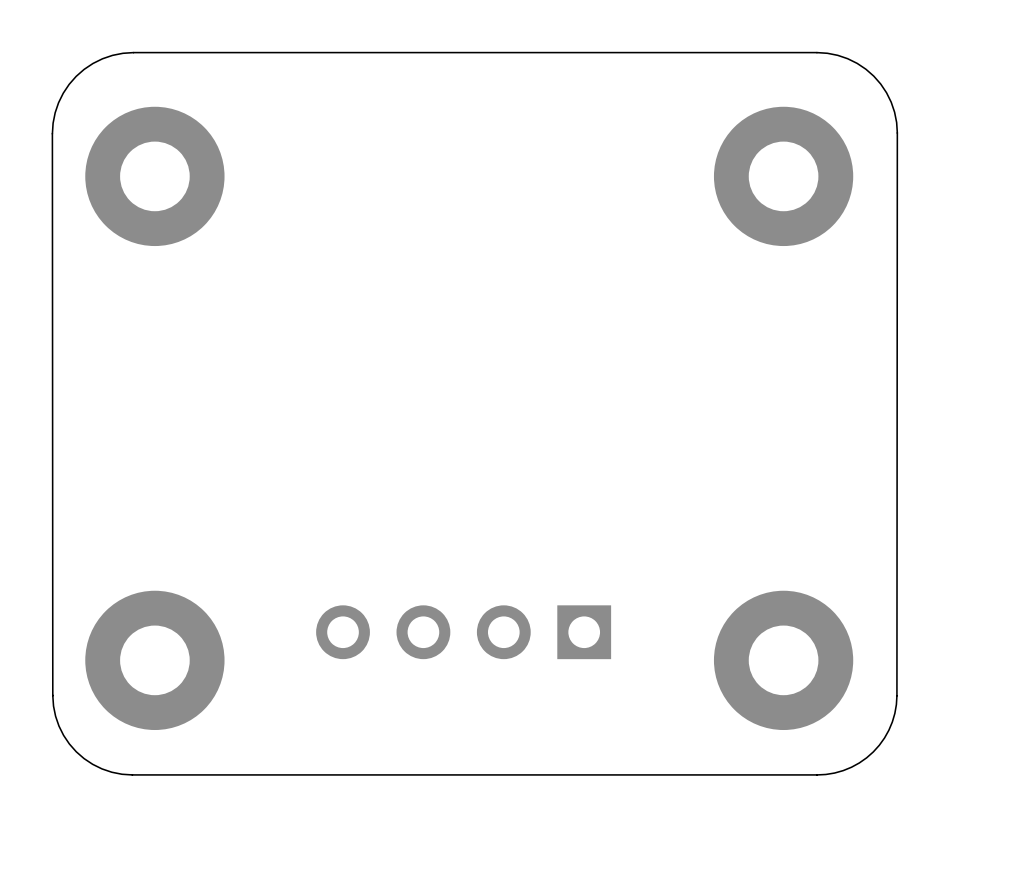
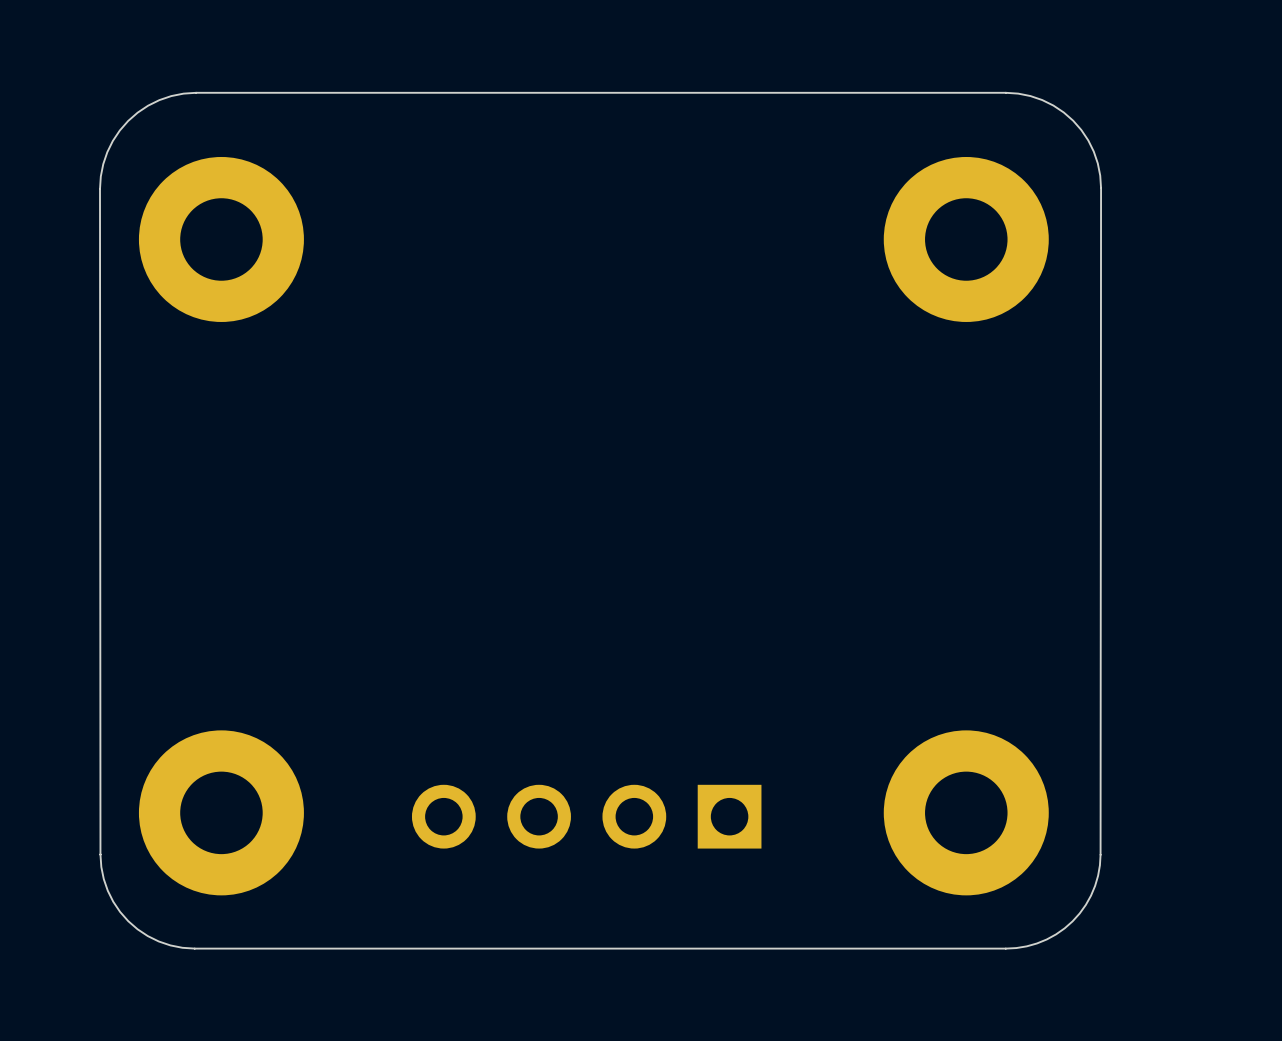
part position: (463, 632) -> (586, 816)

